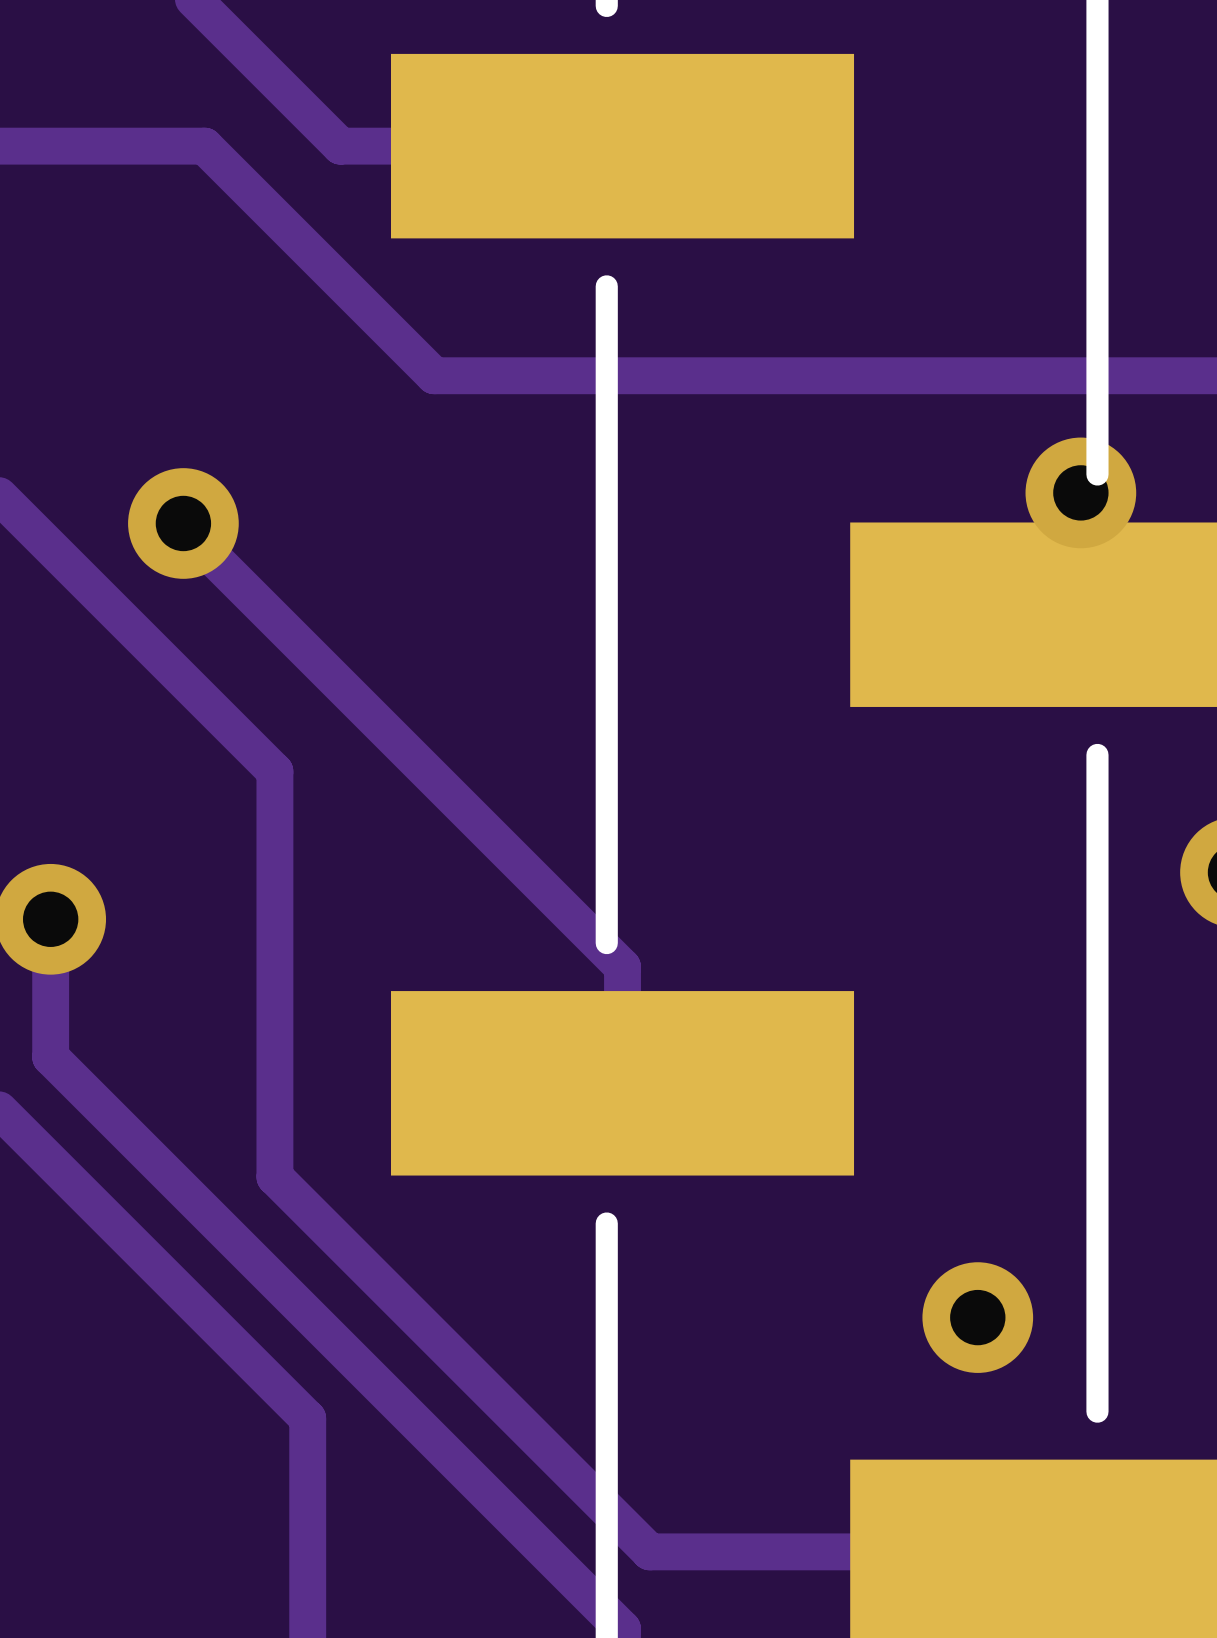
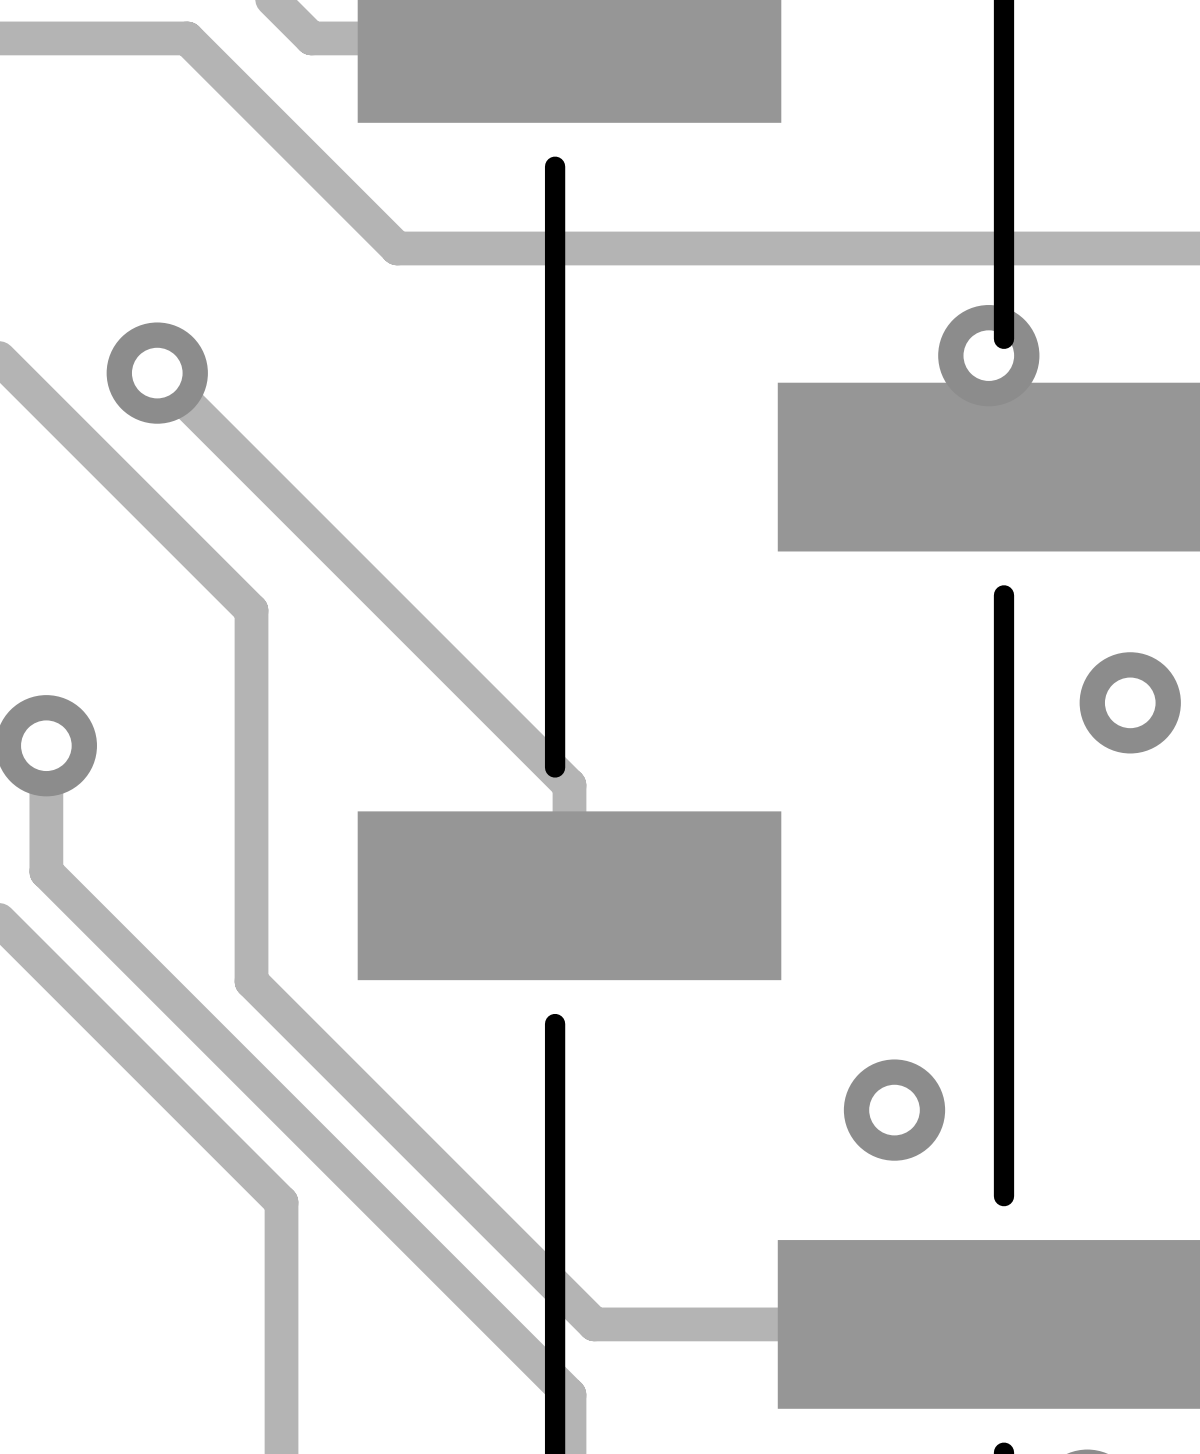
track: (183, 523) (183, 527) (622, 967) -> (157, 373) (569, 785) (569, 789)
via position: (183, 523) -> (157, 373)

